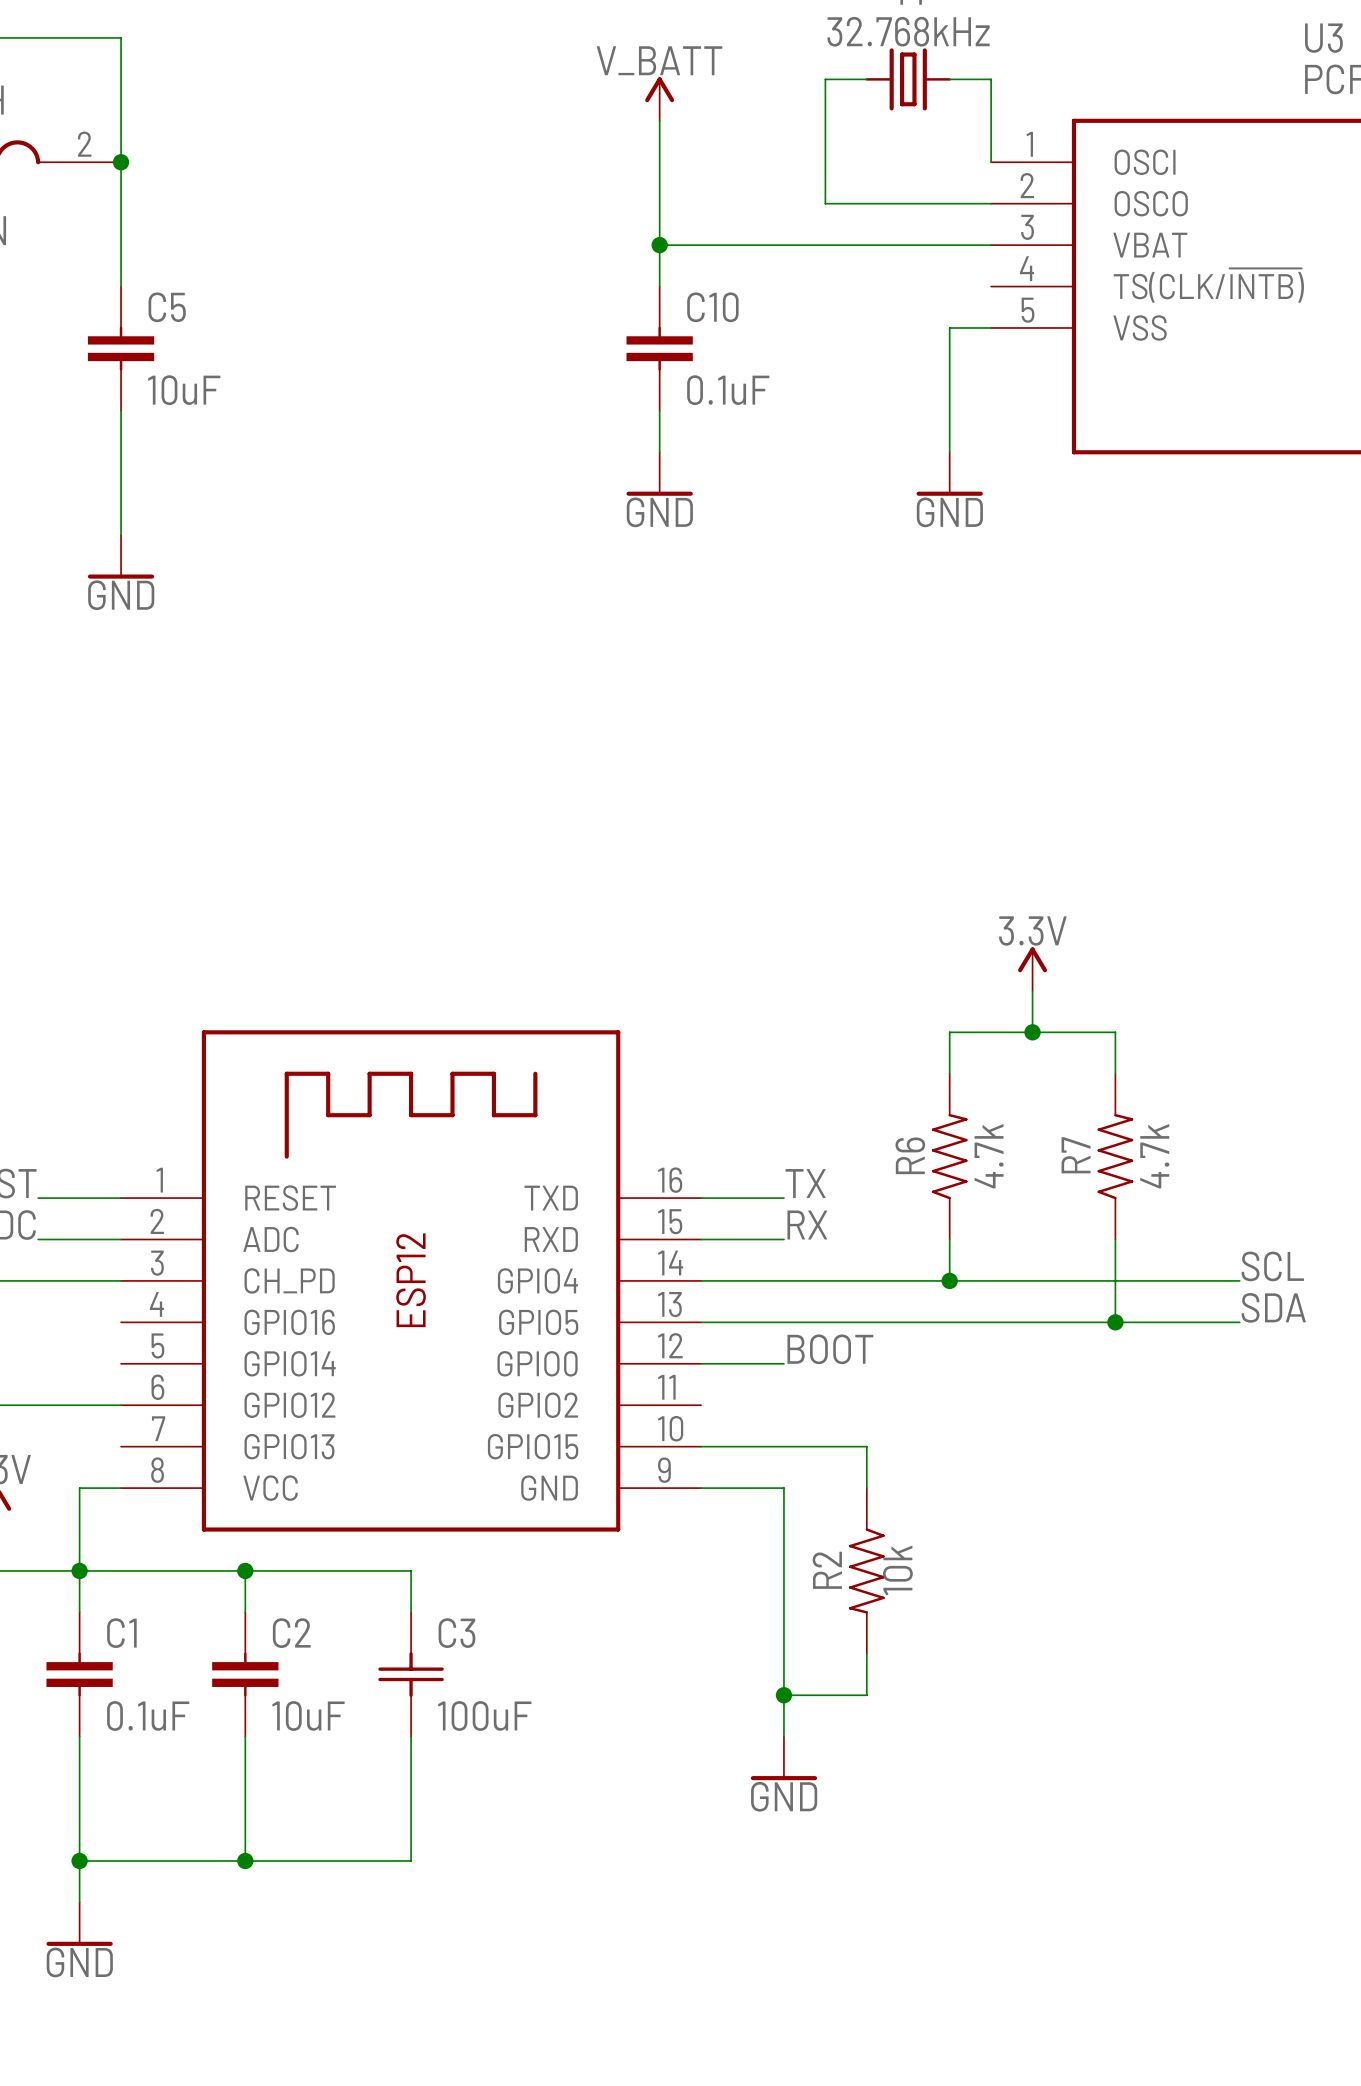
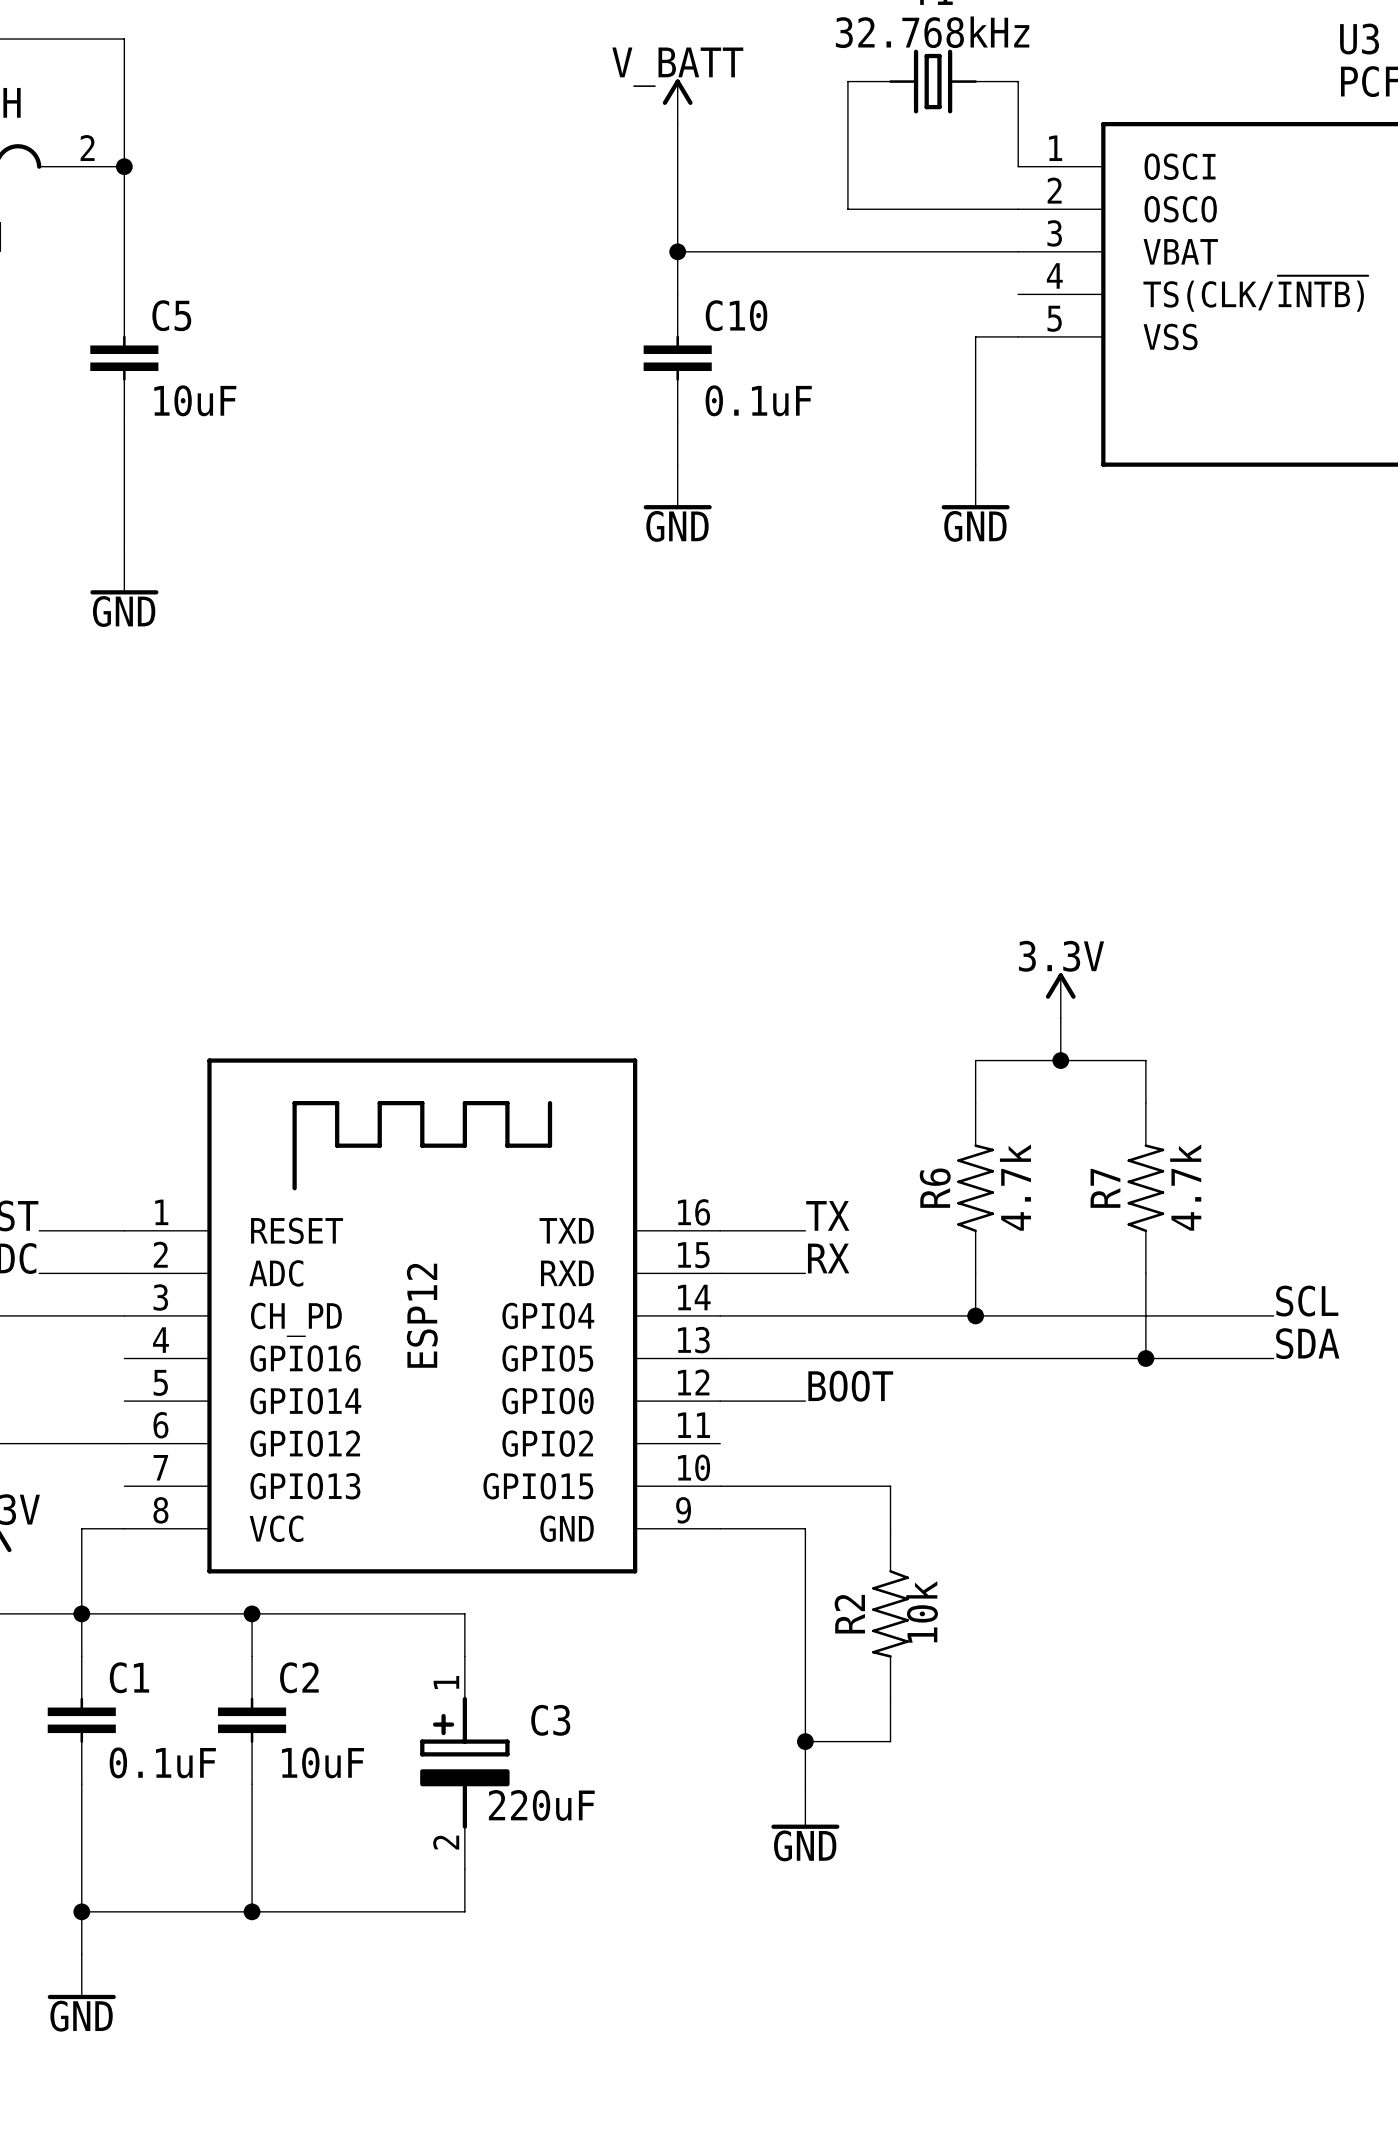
wire: (411, 1570) (411, 1612) -> (422, 1613) (464, 1613) (464, 1656)
C3 symbol: [378, 1612, 444, 1737] -> [420, 1656, 510, 1870]
C3 name position: C3 (456, 1633) -> C3 (550, 1720)
C3 value: 100uF (484, 1715) -> 220uF (541, 1805)
wire: (411, 1736) (411, 1860) -> (464, 1869) (464, 1911) (422, 1911)

